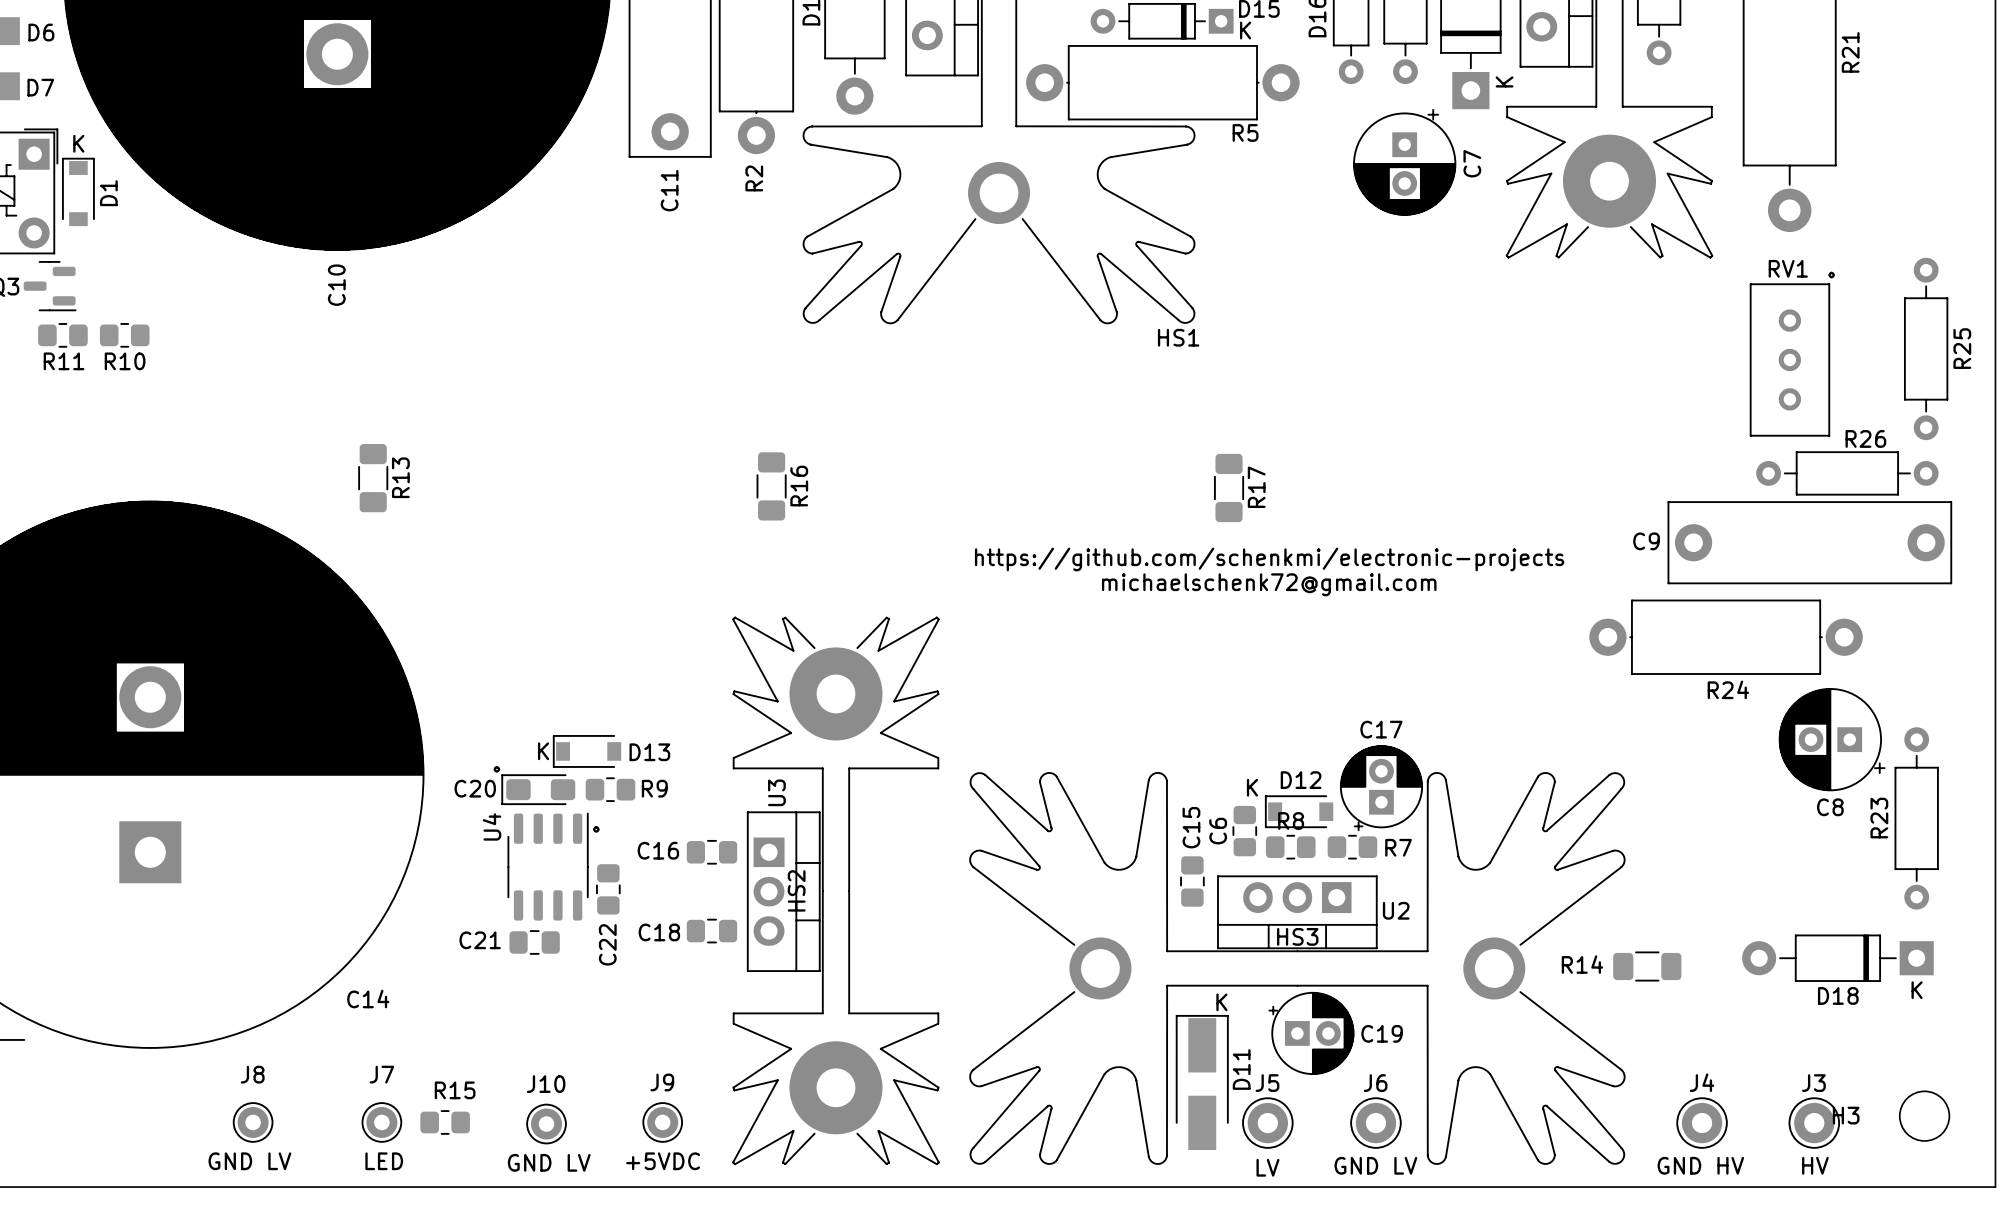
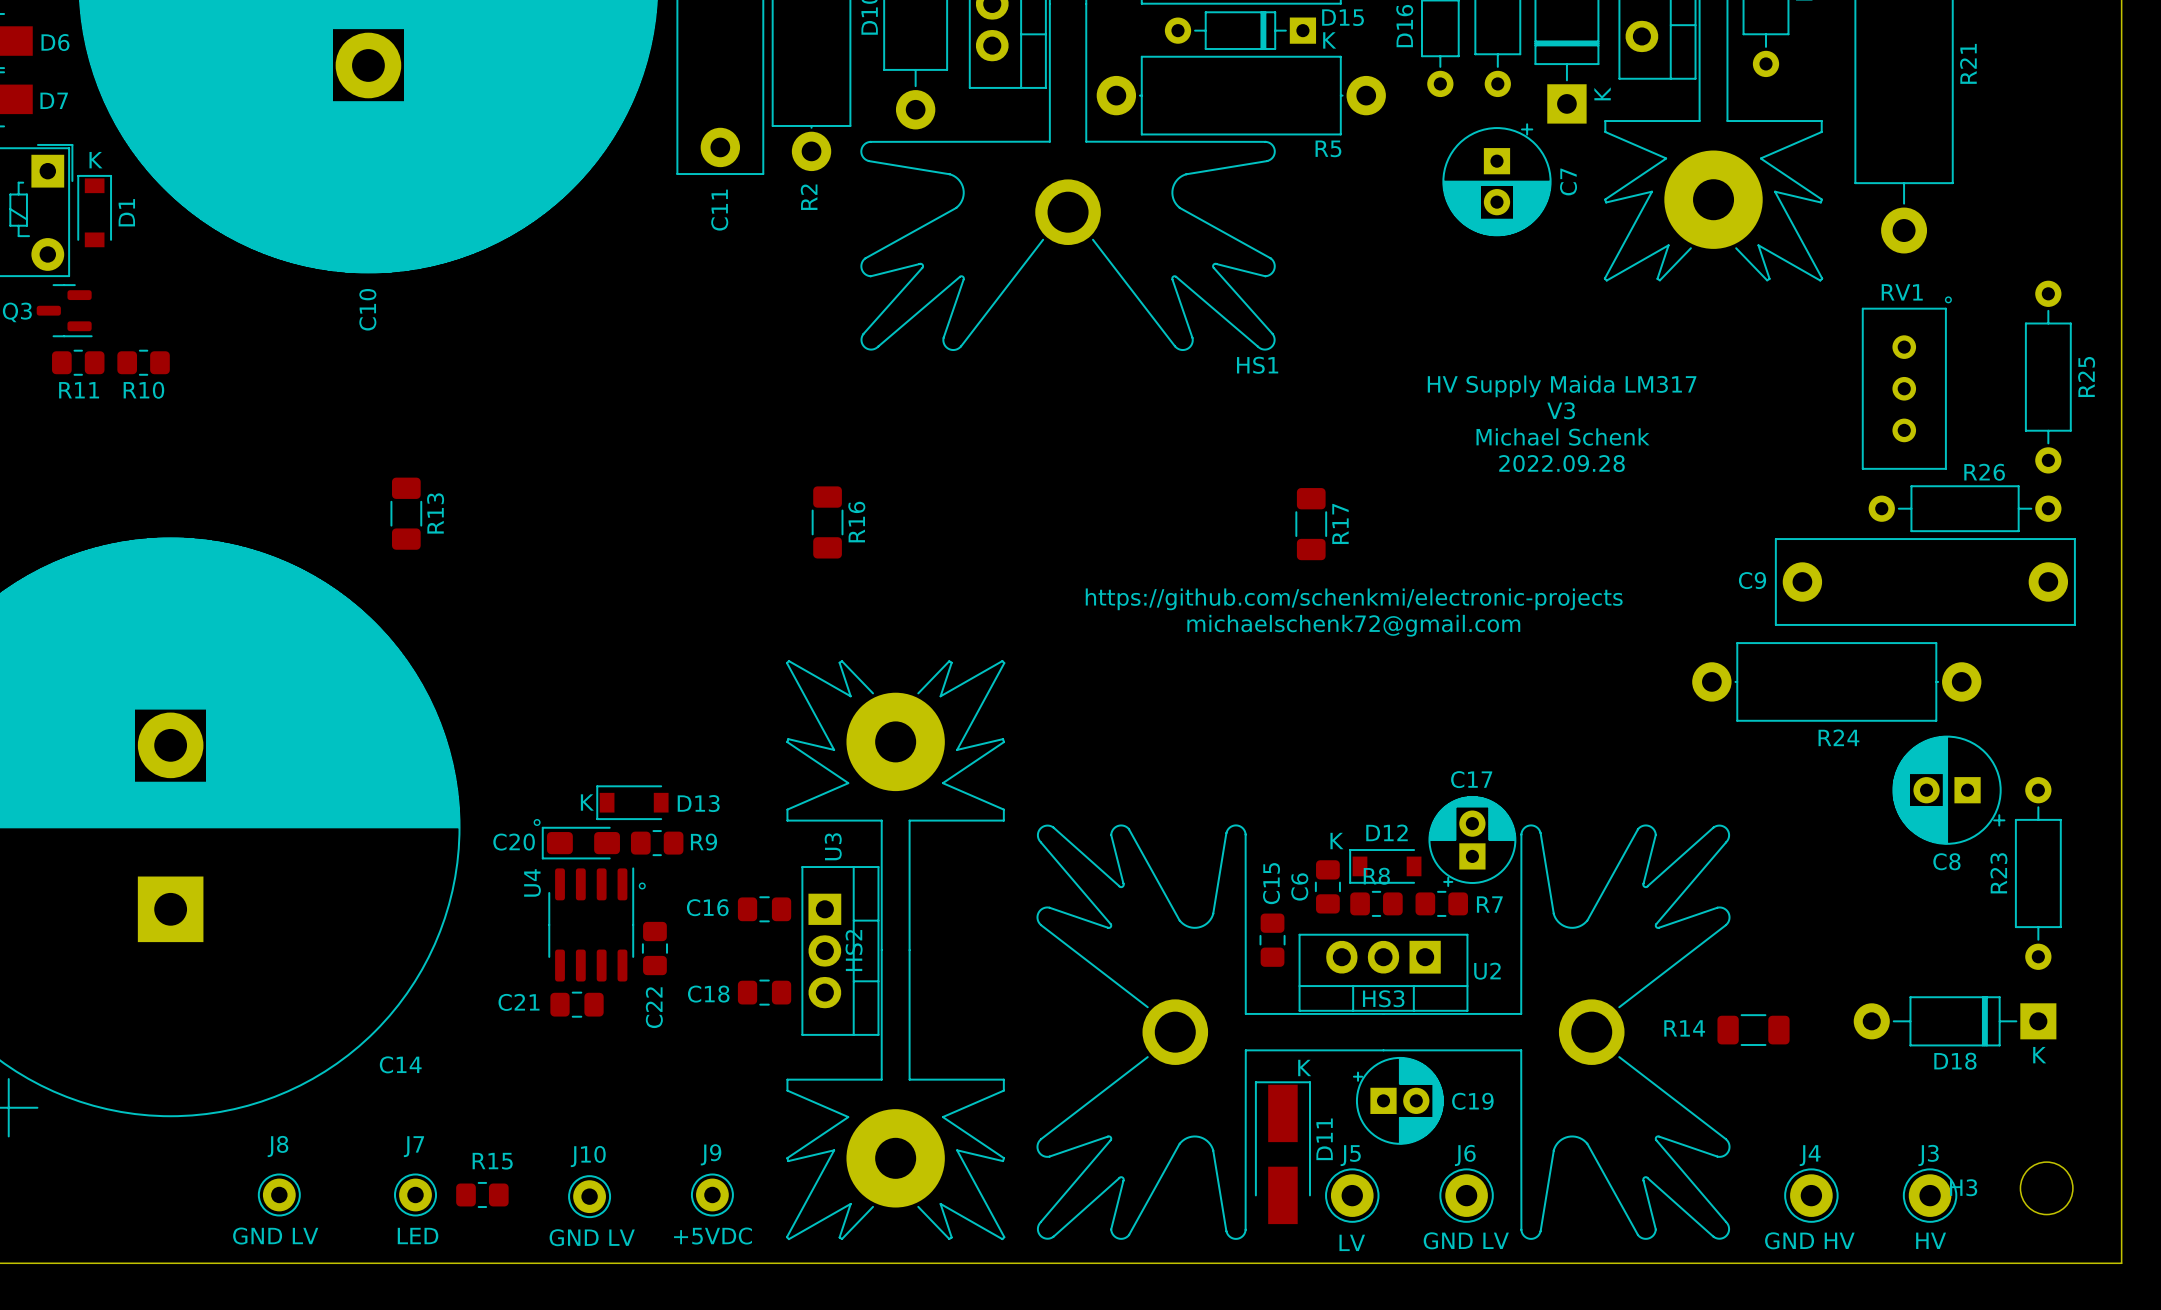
text: none -> HV Supply Maida LM317 (1562, 386)
text: none -> V3 (1561, 410)
text: none -> Michael Schenk (1563, 436)
text: none -> 2022.09.28 (1562, 463)

